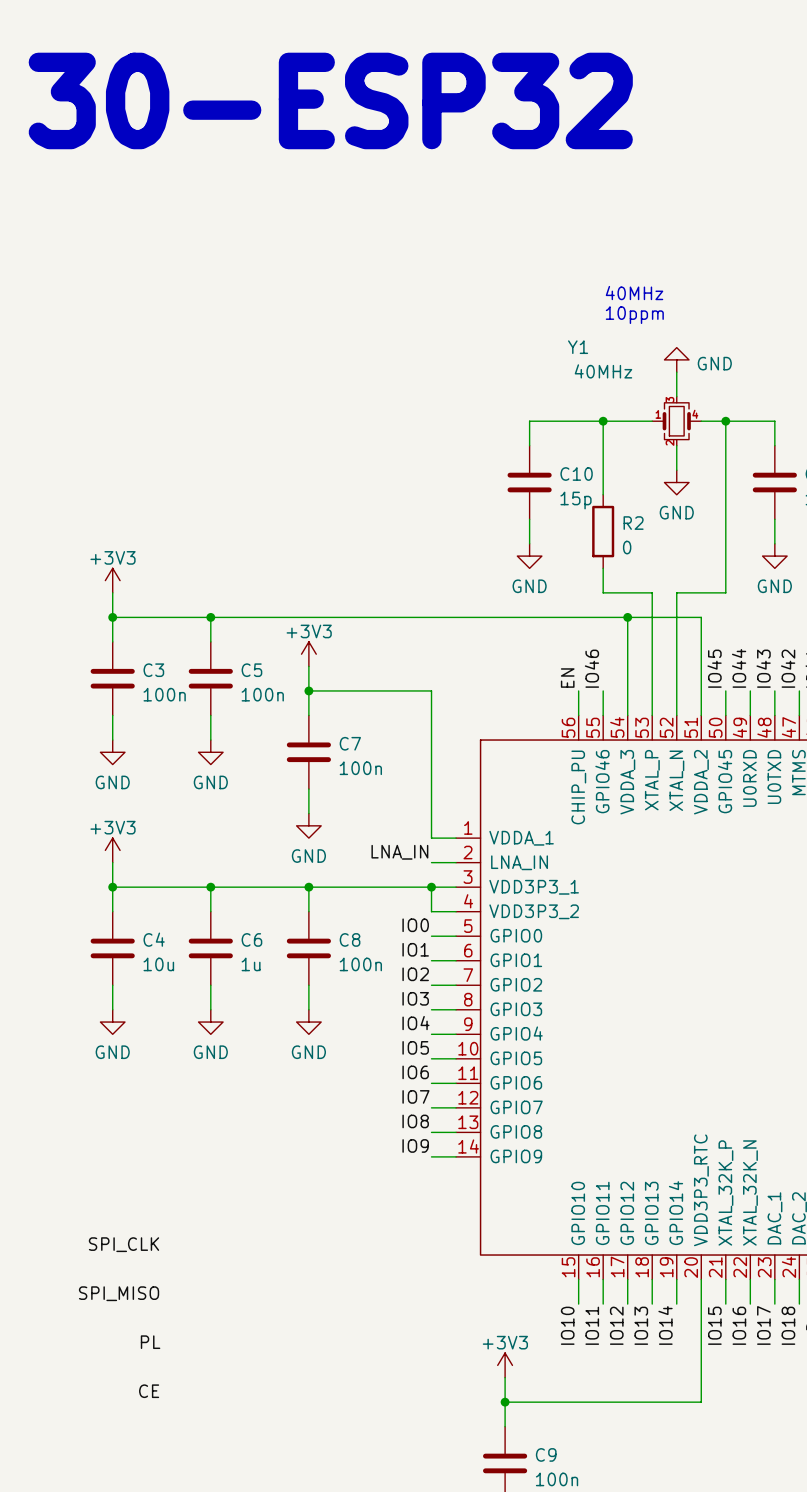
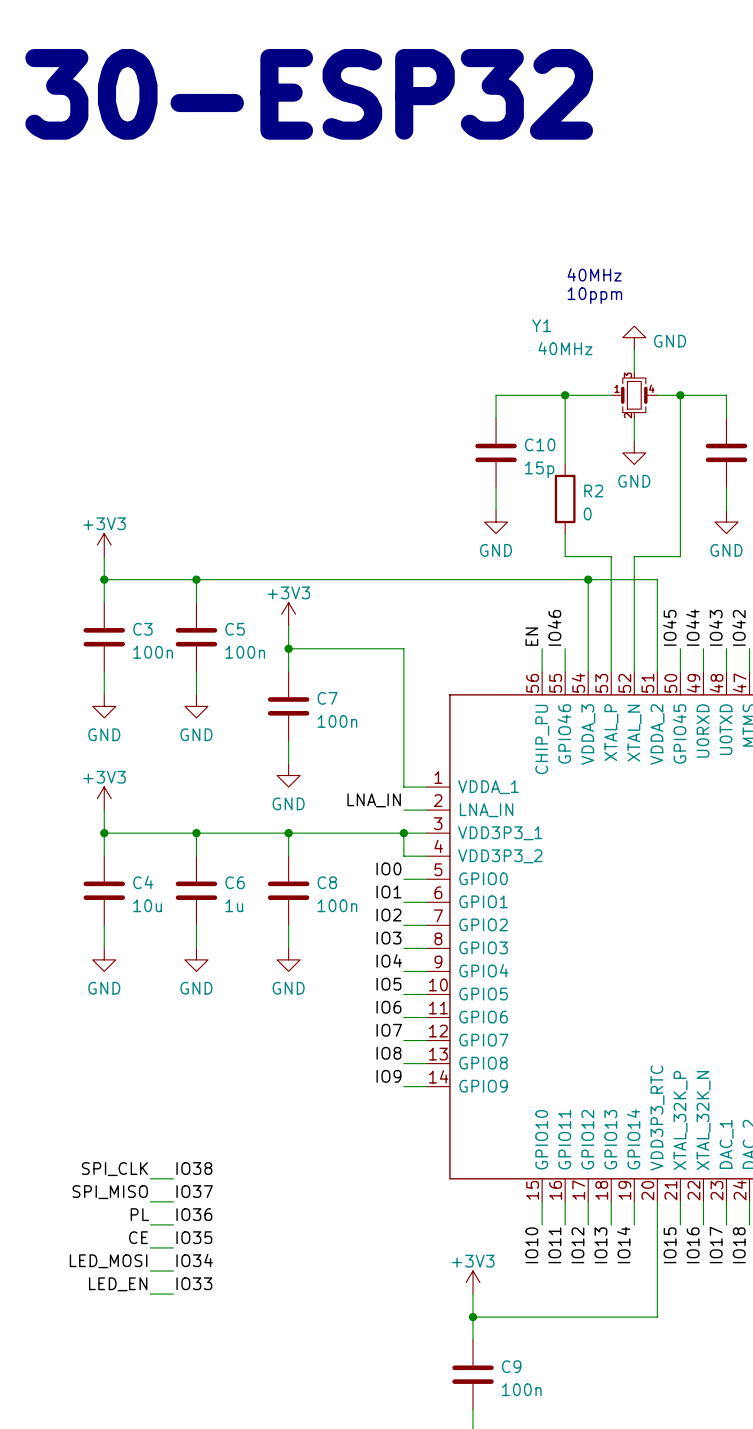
label: none -> IO38 (194, 1168)
wire: none -> (150, 1178) (173, 1178)
label: none -> IO37 (194, 1191)
label: none -> SPI_MISO (110, 1192)
wire: none -> (150, 1201) (173, 1201)
label: SPI_MISO (119, 1293) -> PL (139, 1214)
label: none -> IO36 (194, 1214)
wire: none -> (150, 1224) (173, 1224)
label: none -> IO35 (194, 1237)
wire: none -> (150, 1247) (173, 1247)
label: none -> IO34 (194, 1260)
label: PL (150, 1342) -> LED_MOSI (108, 1261)
wire: none -> (150, 1271) (173, 1271)
label: none -> IO33 (194, 1283)
label: none -> LED_EN (118, 1284)
wire: none -> (150, 1294) (173, 1294)
label position: CE (149, 1391) -> CE (138, 1237)

